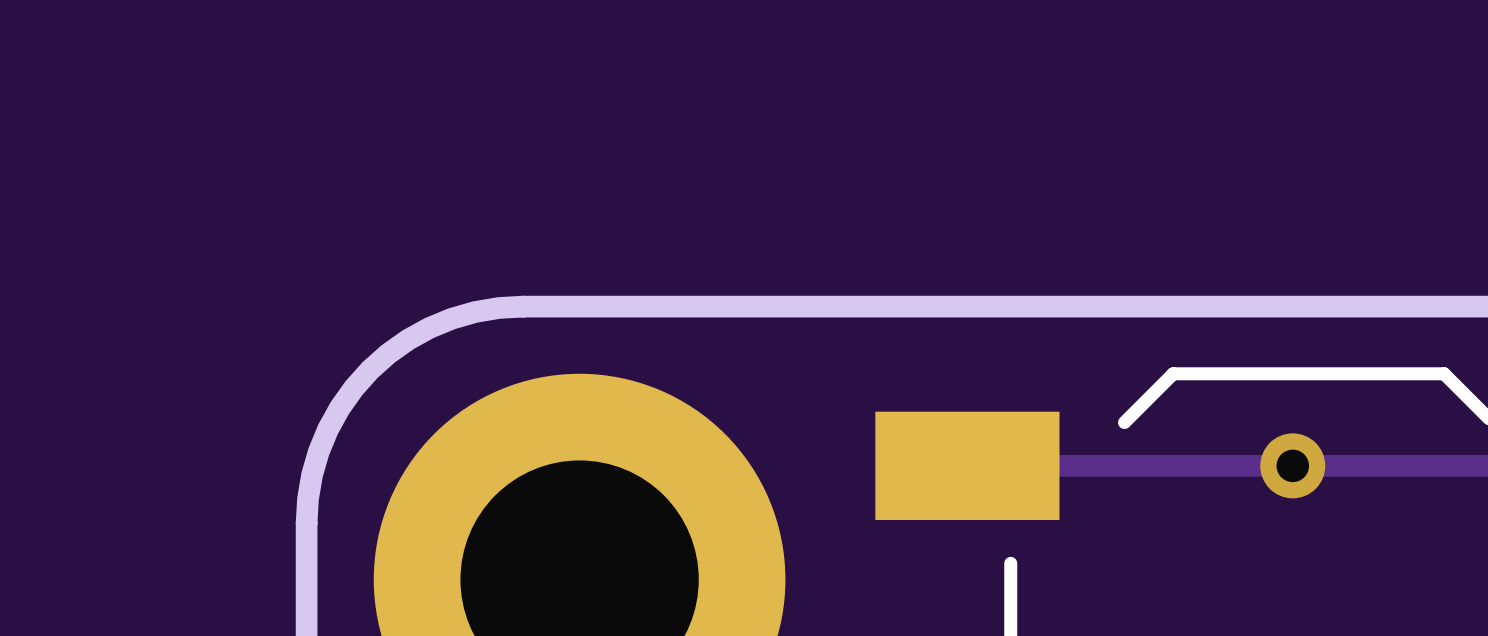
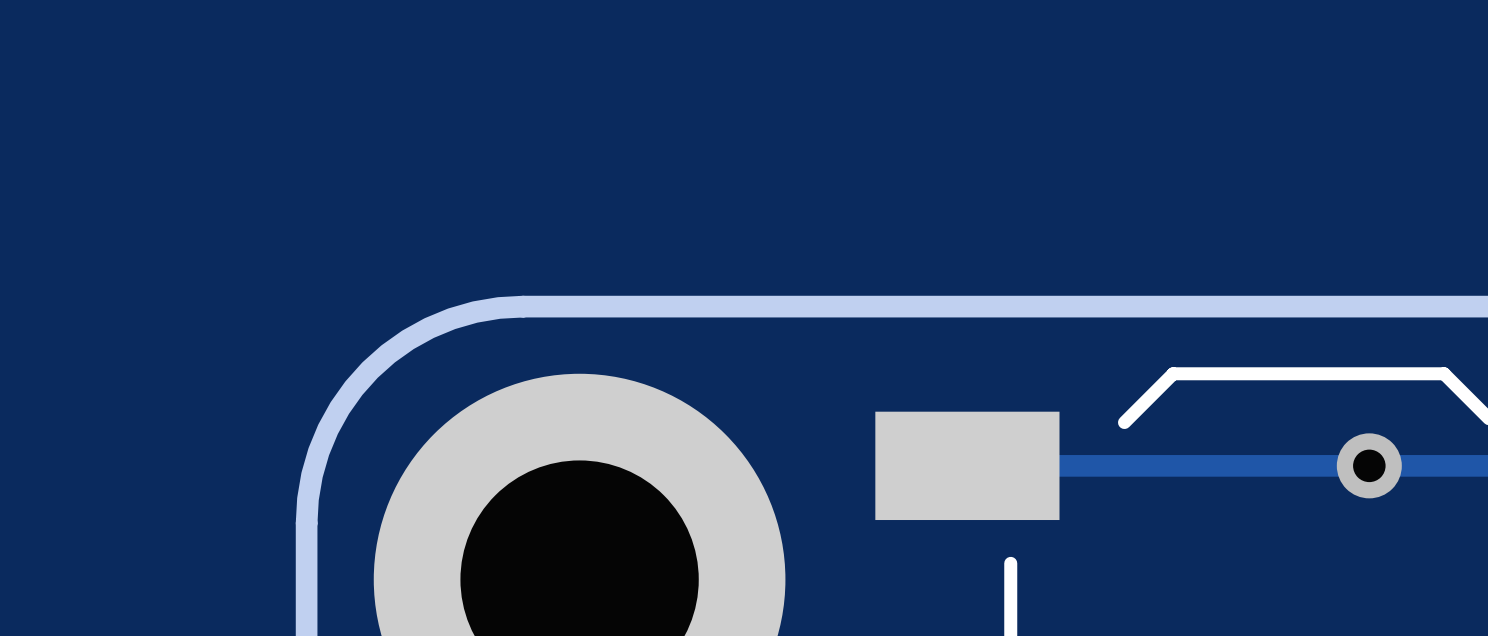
via position: (1292, 465) -> (1369, 465)

